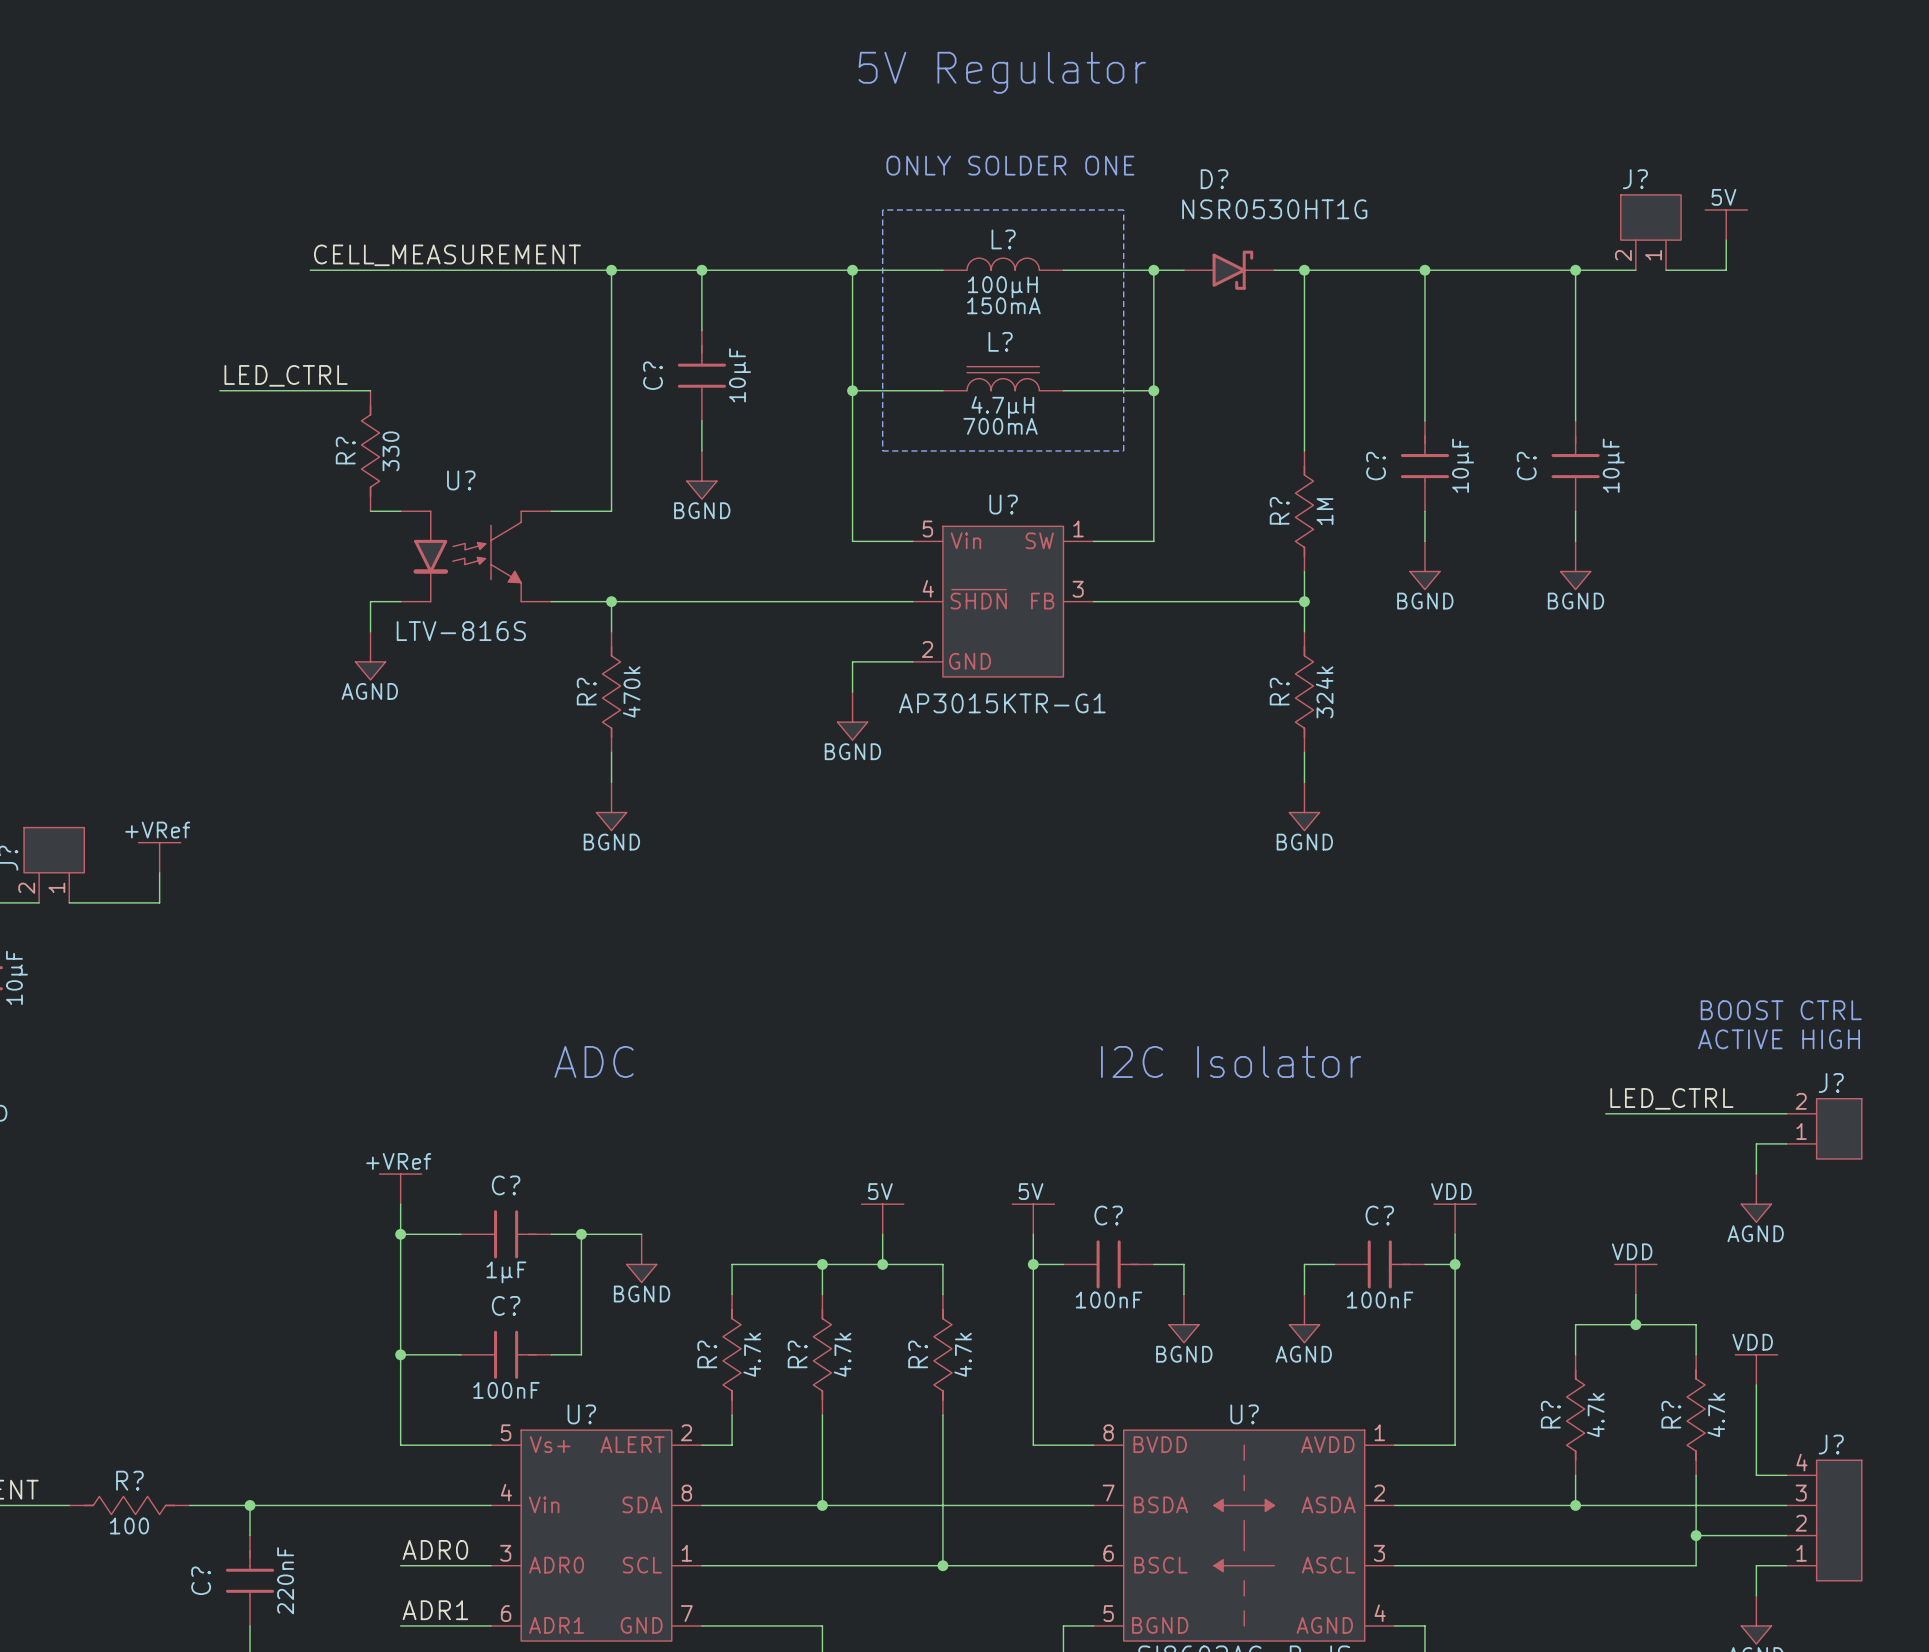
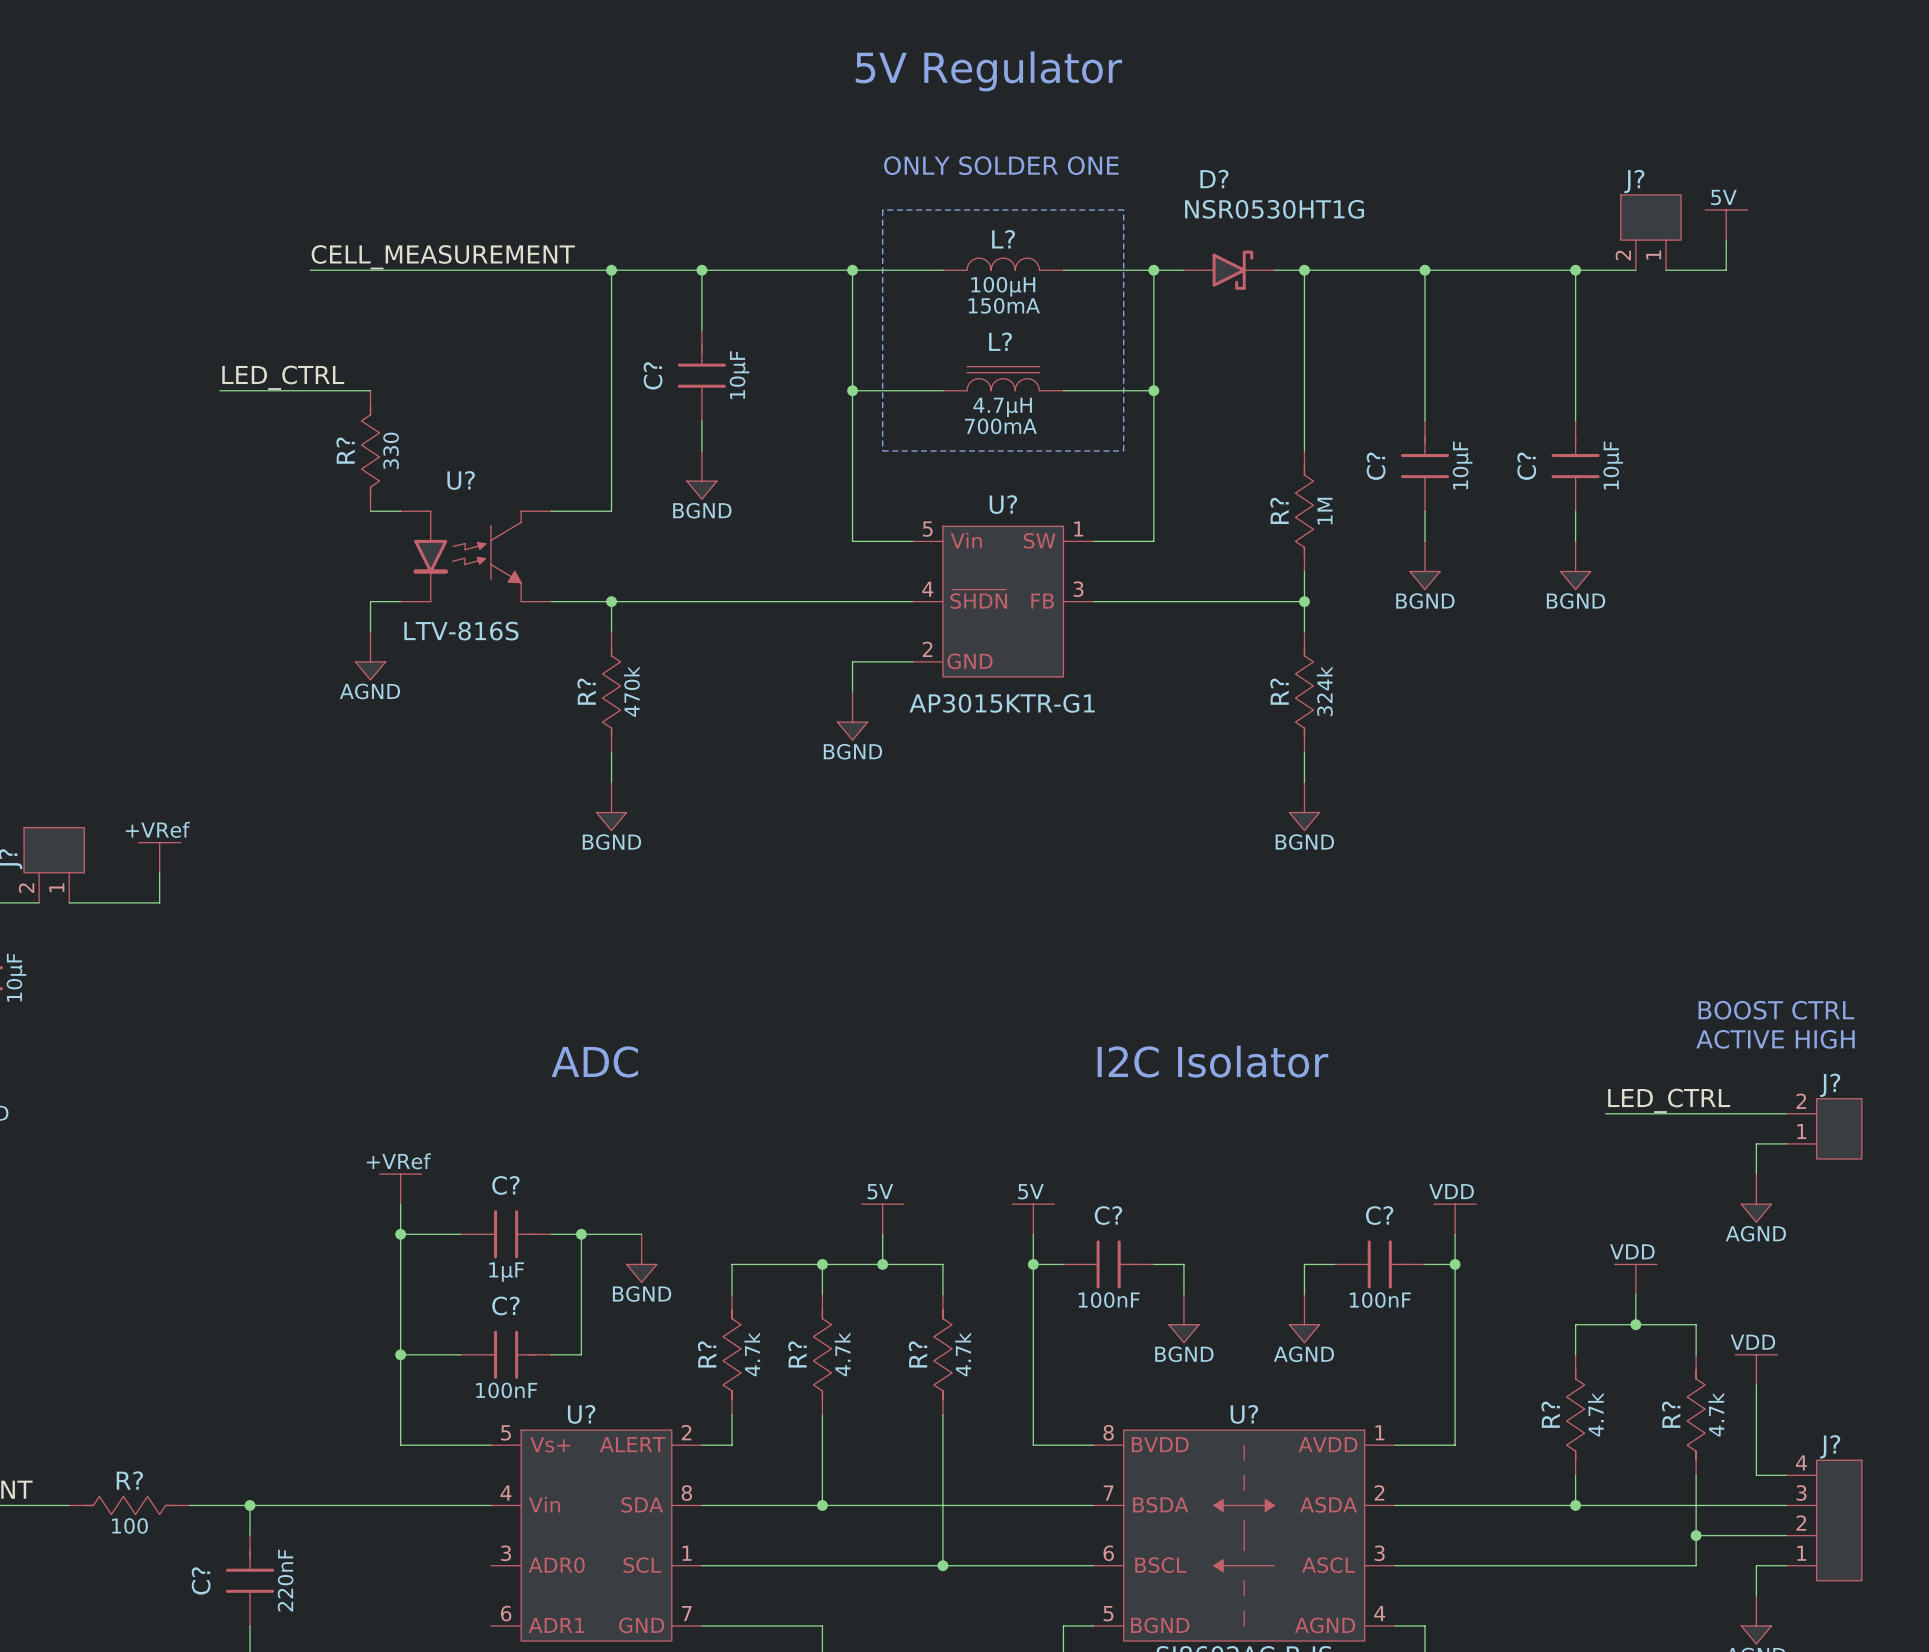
label: ADR0 (435, 1549) -> none
wire: (400, 1565) (491, 1565) -> none
label: ADR1 (435, 1610) -> none
wire: (400, 1625) (491, 1625) -> none

